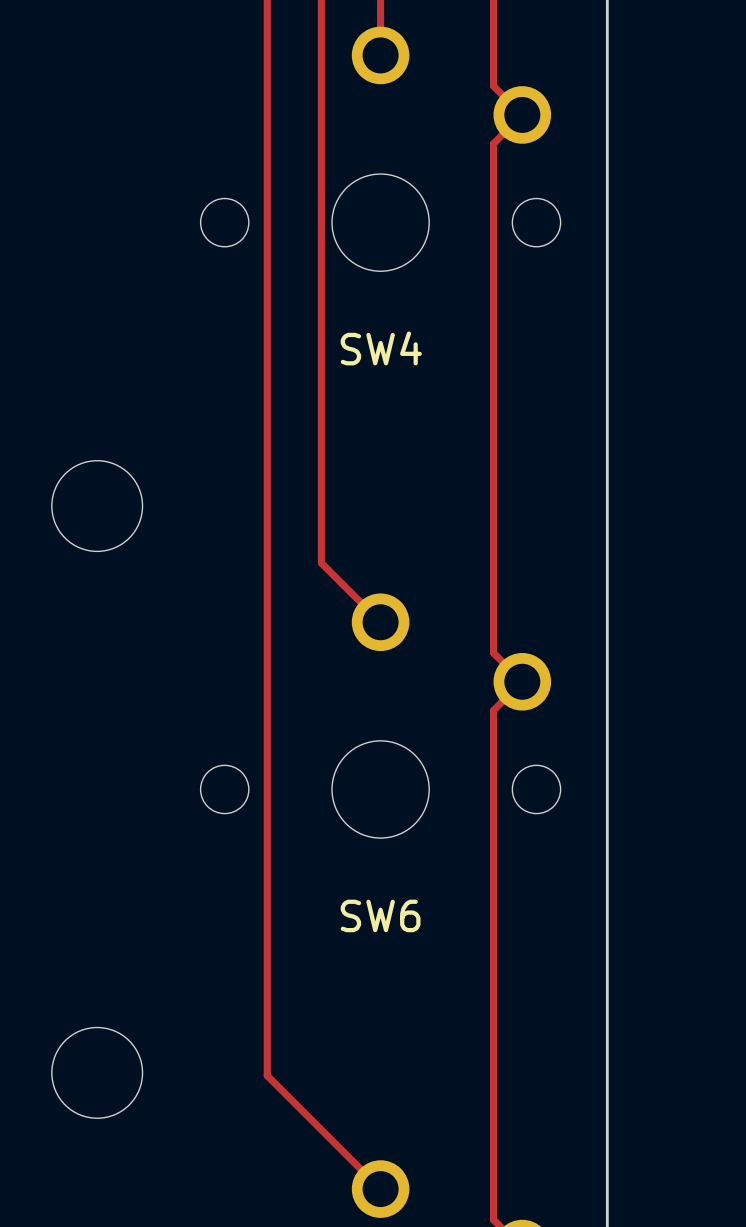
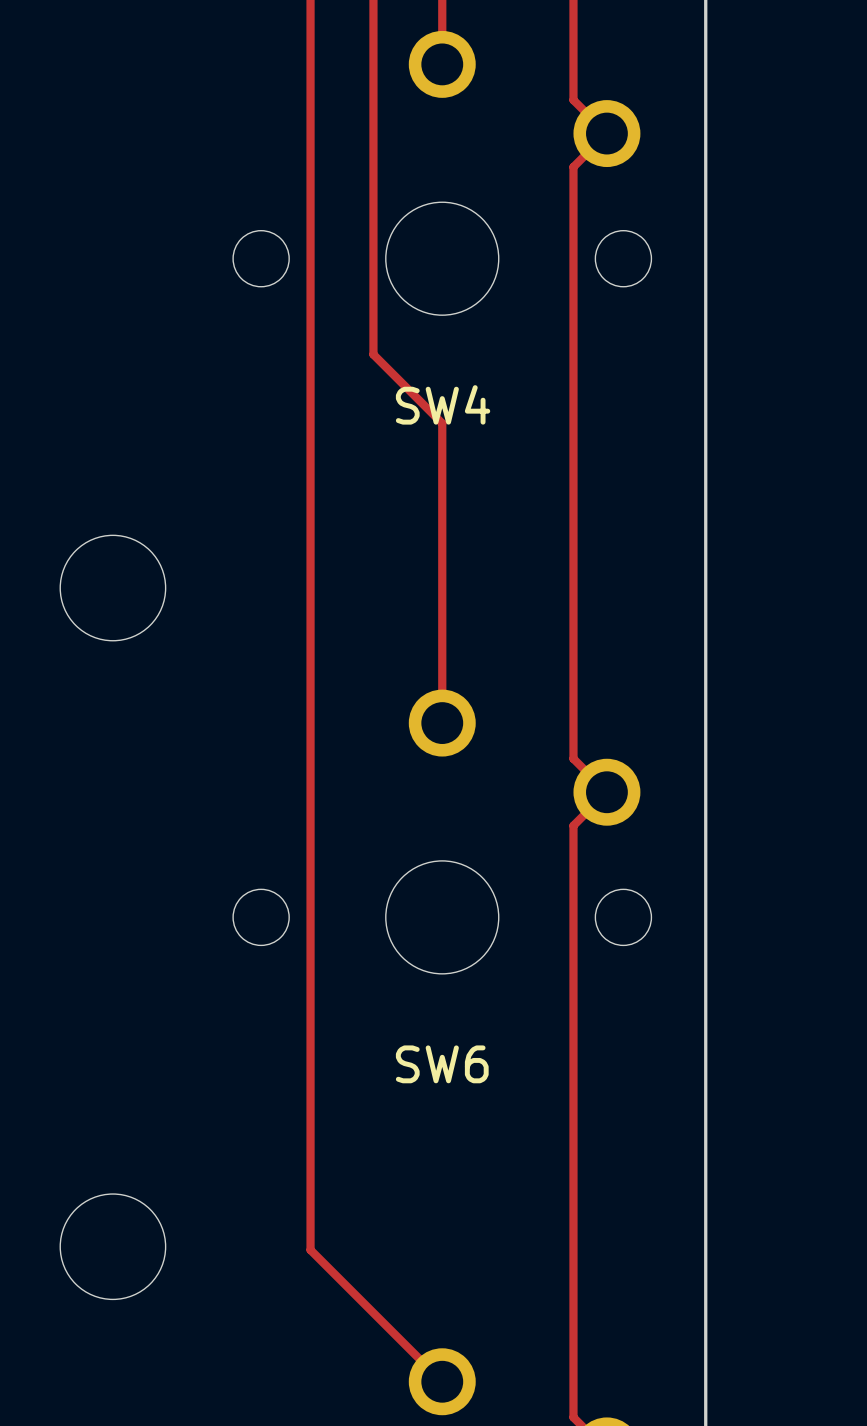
track: (321, 305) (321, 563) (380, 622) -> (373, 354) (442, 423) (442, 723)

